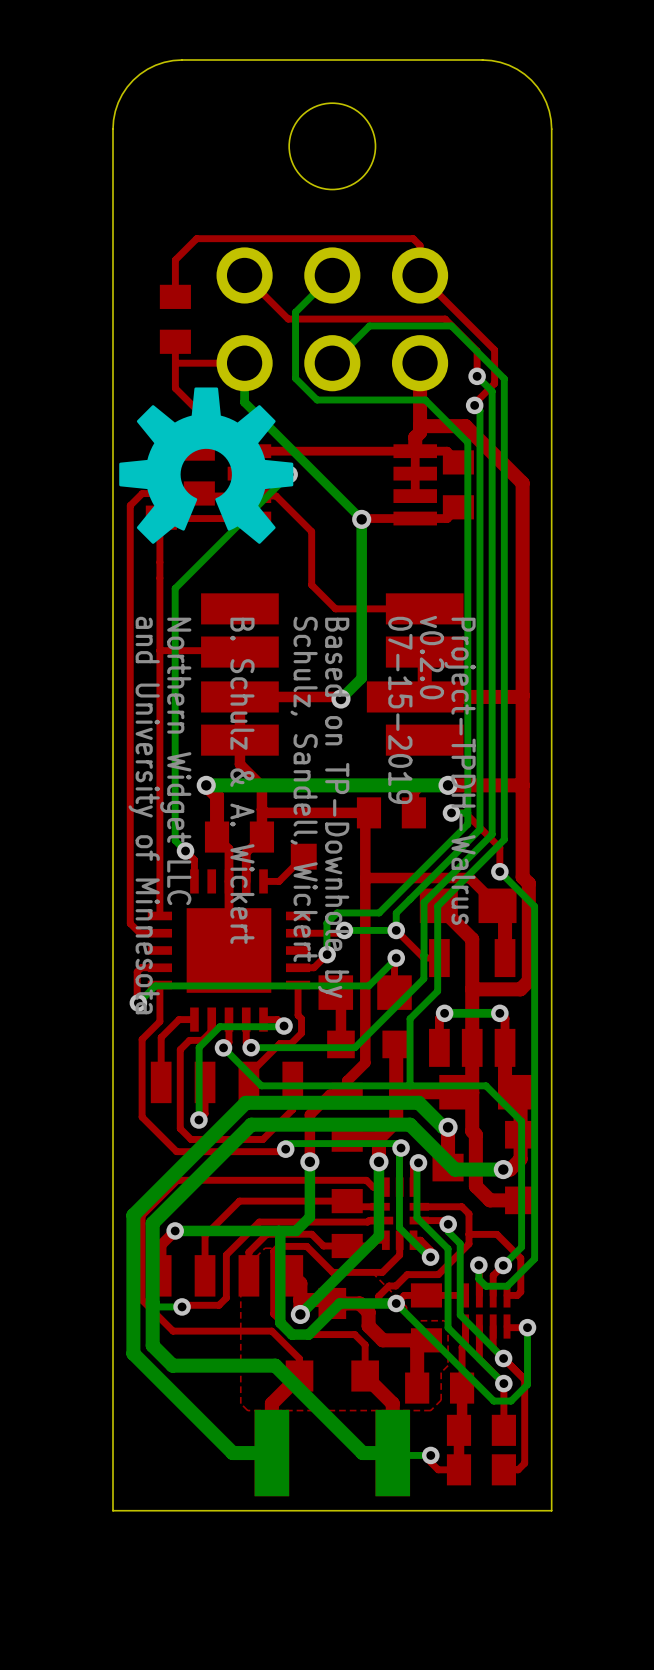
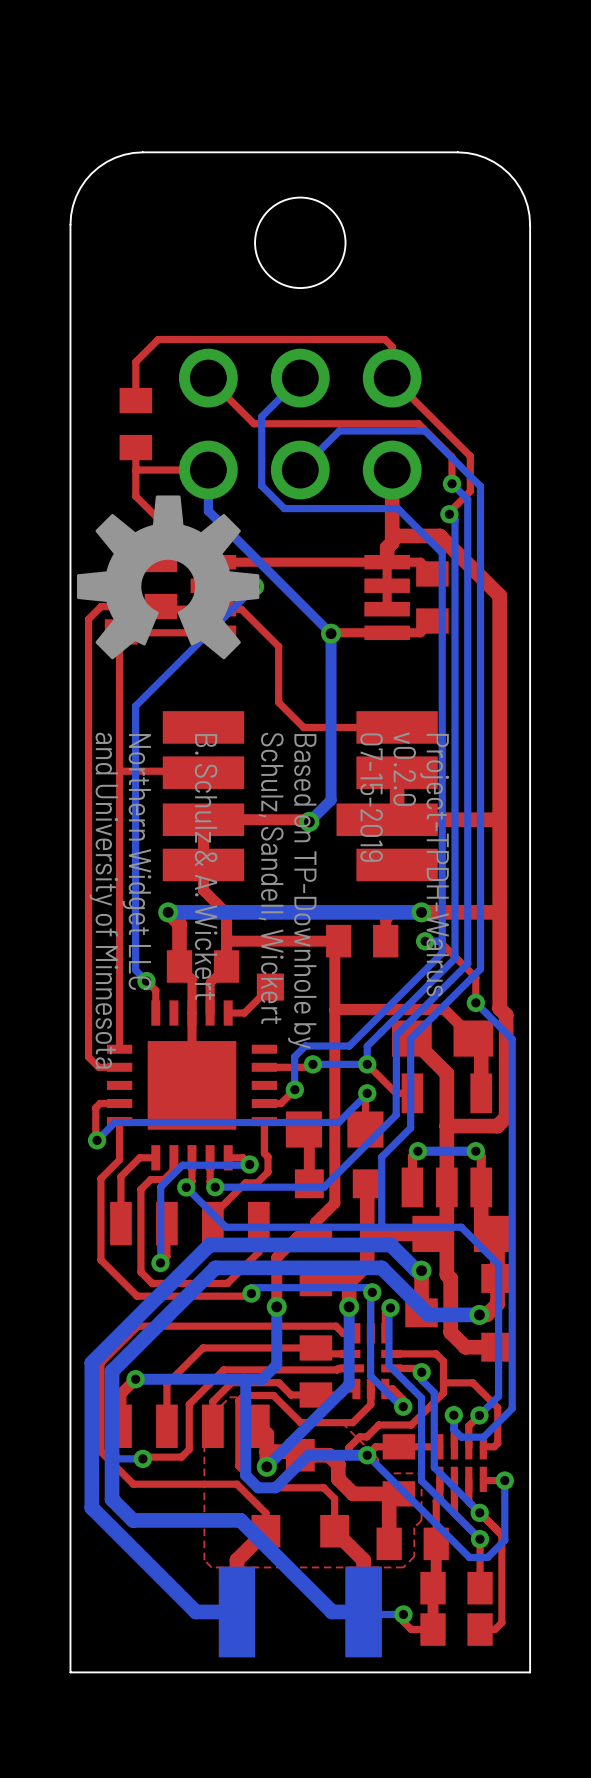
drawing shape: [119, 387, 294, 544] -> [77, 495, 260, 660]

